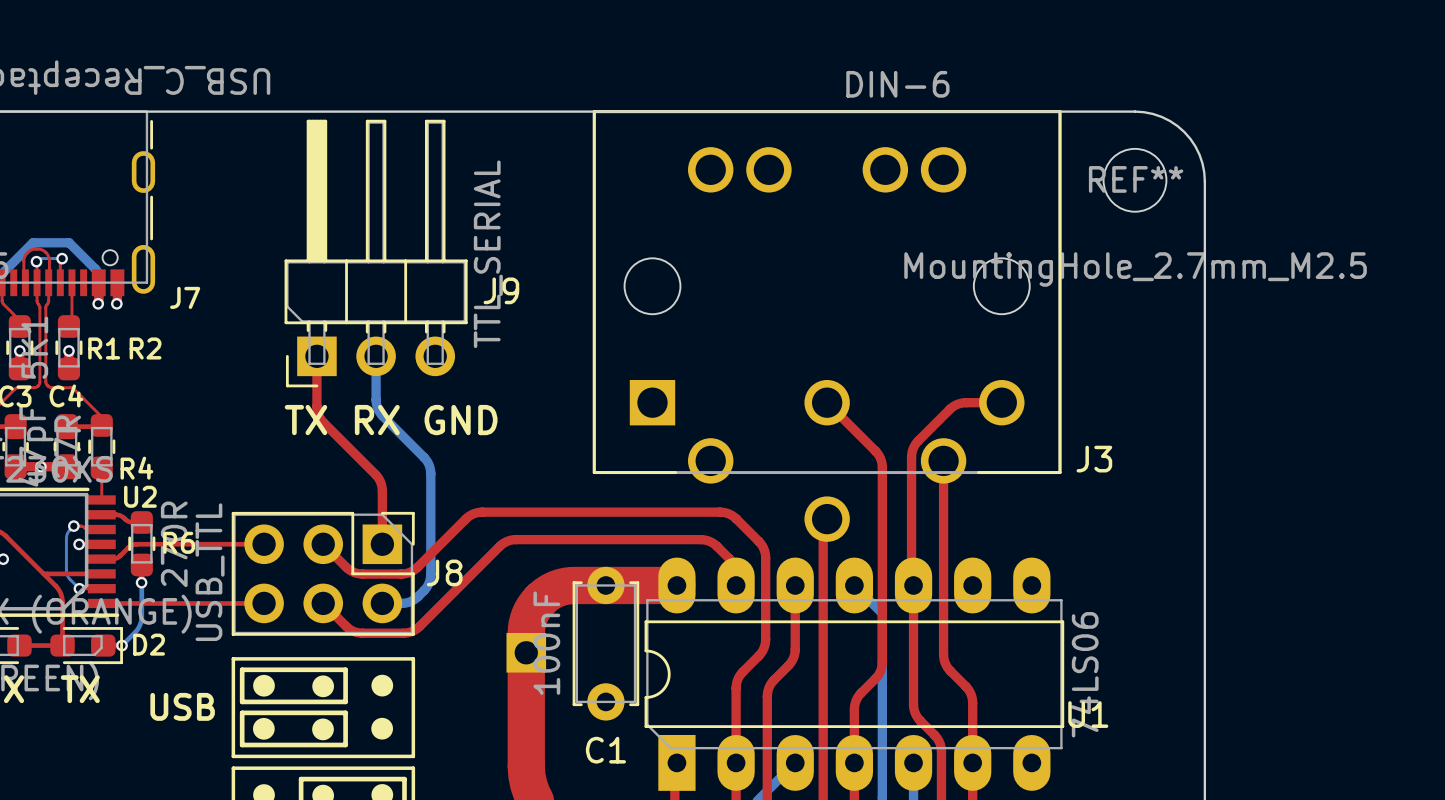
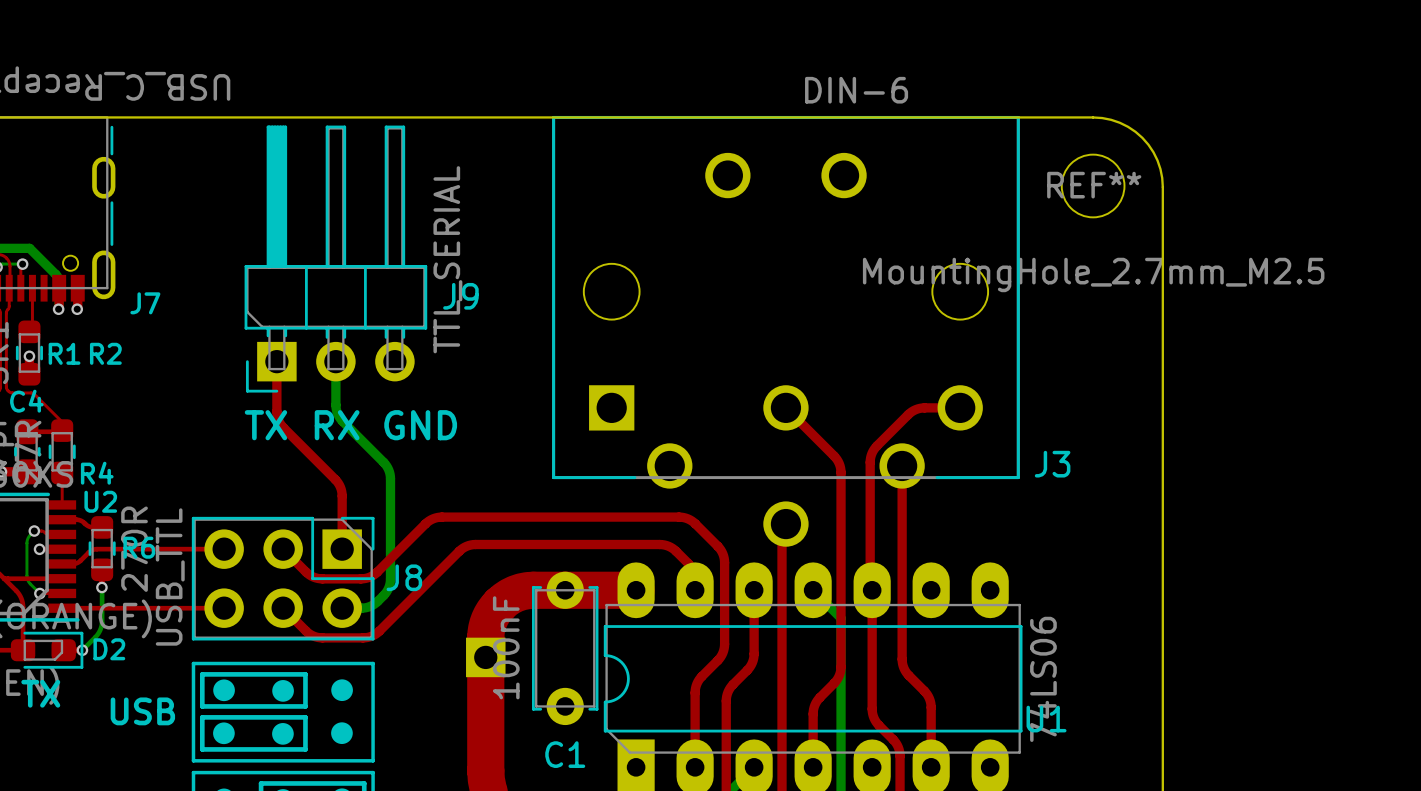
J3 footprint: [592, 110, 1062, 542] -> [552, 115, 1020, 547]

